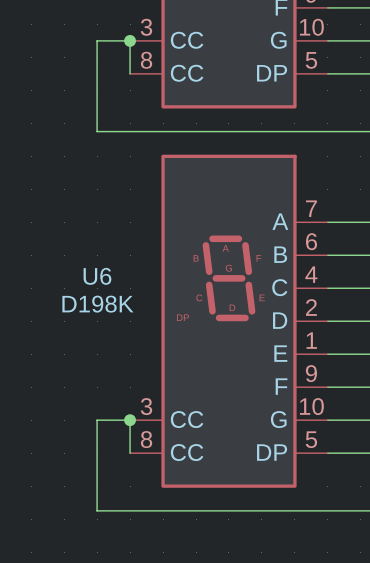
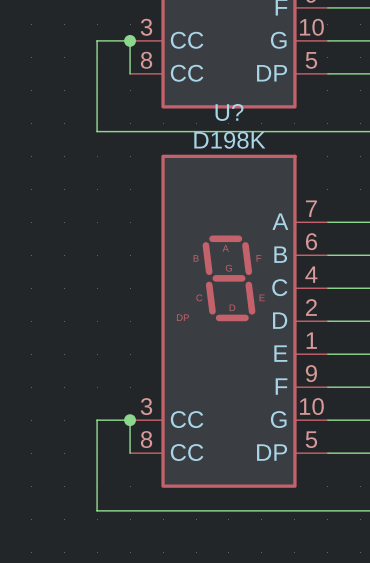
U6 name: U6 (97, 276) -> U? (229, 112)
U6 value position: D198K (97, 304) -> D198K (229, 140)

